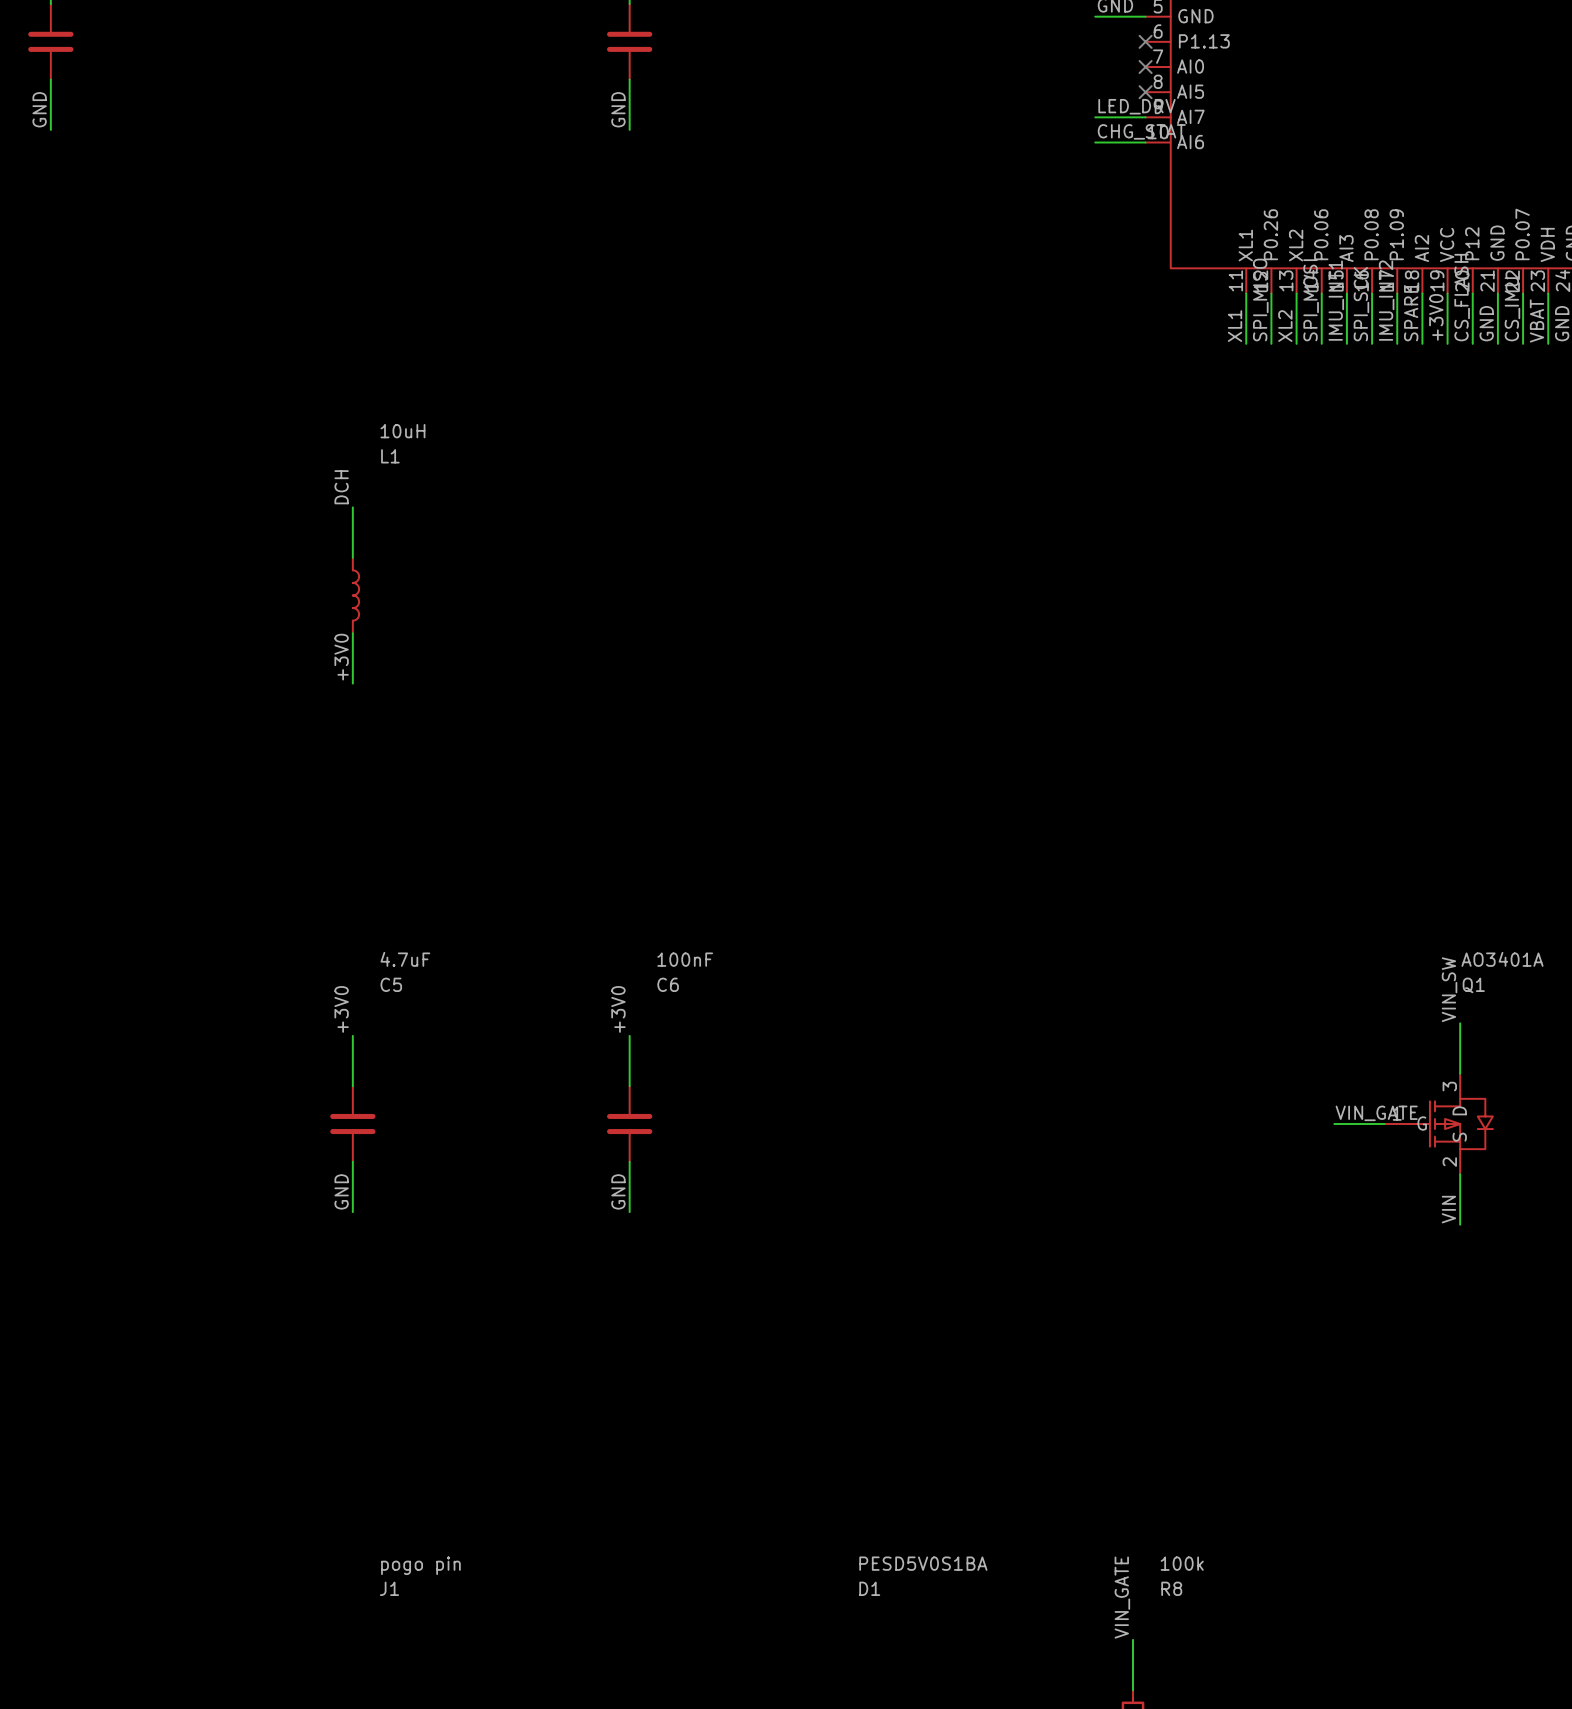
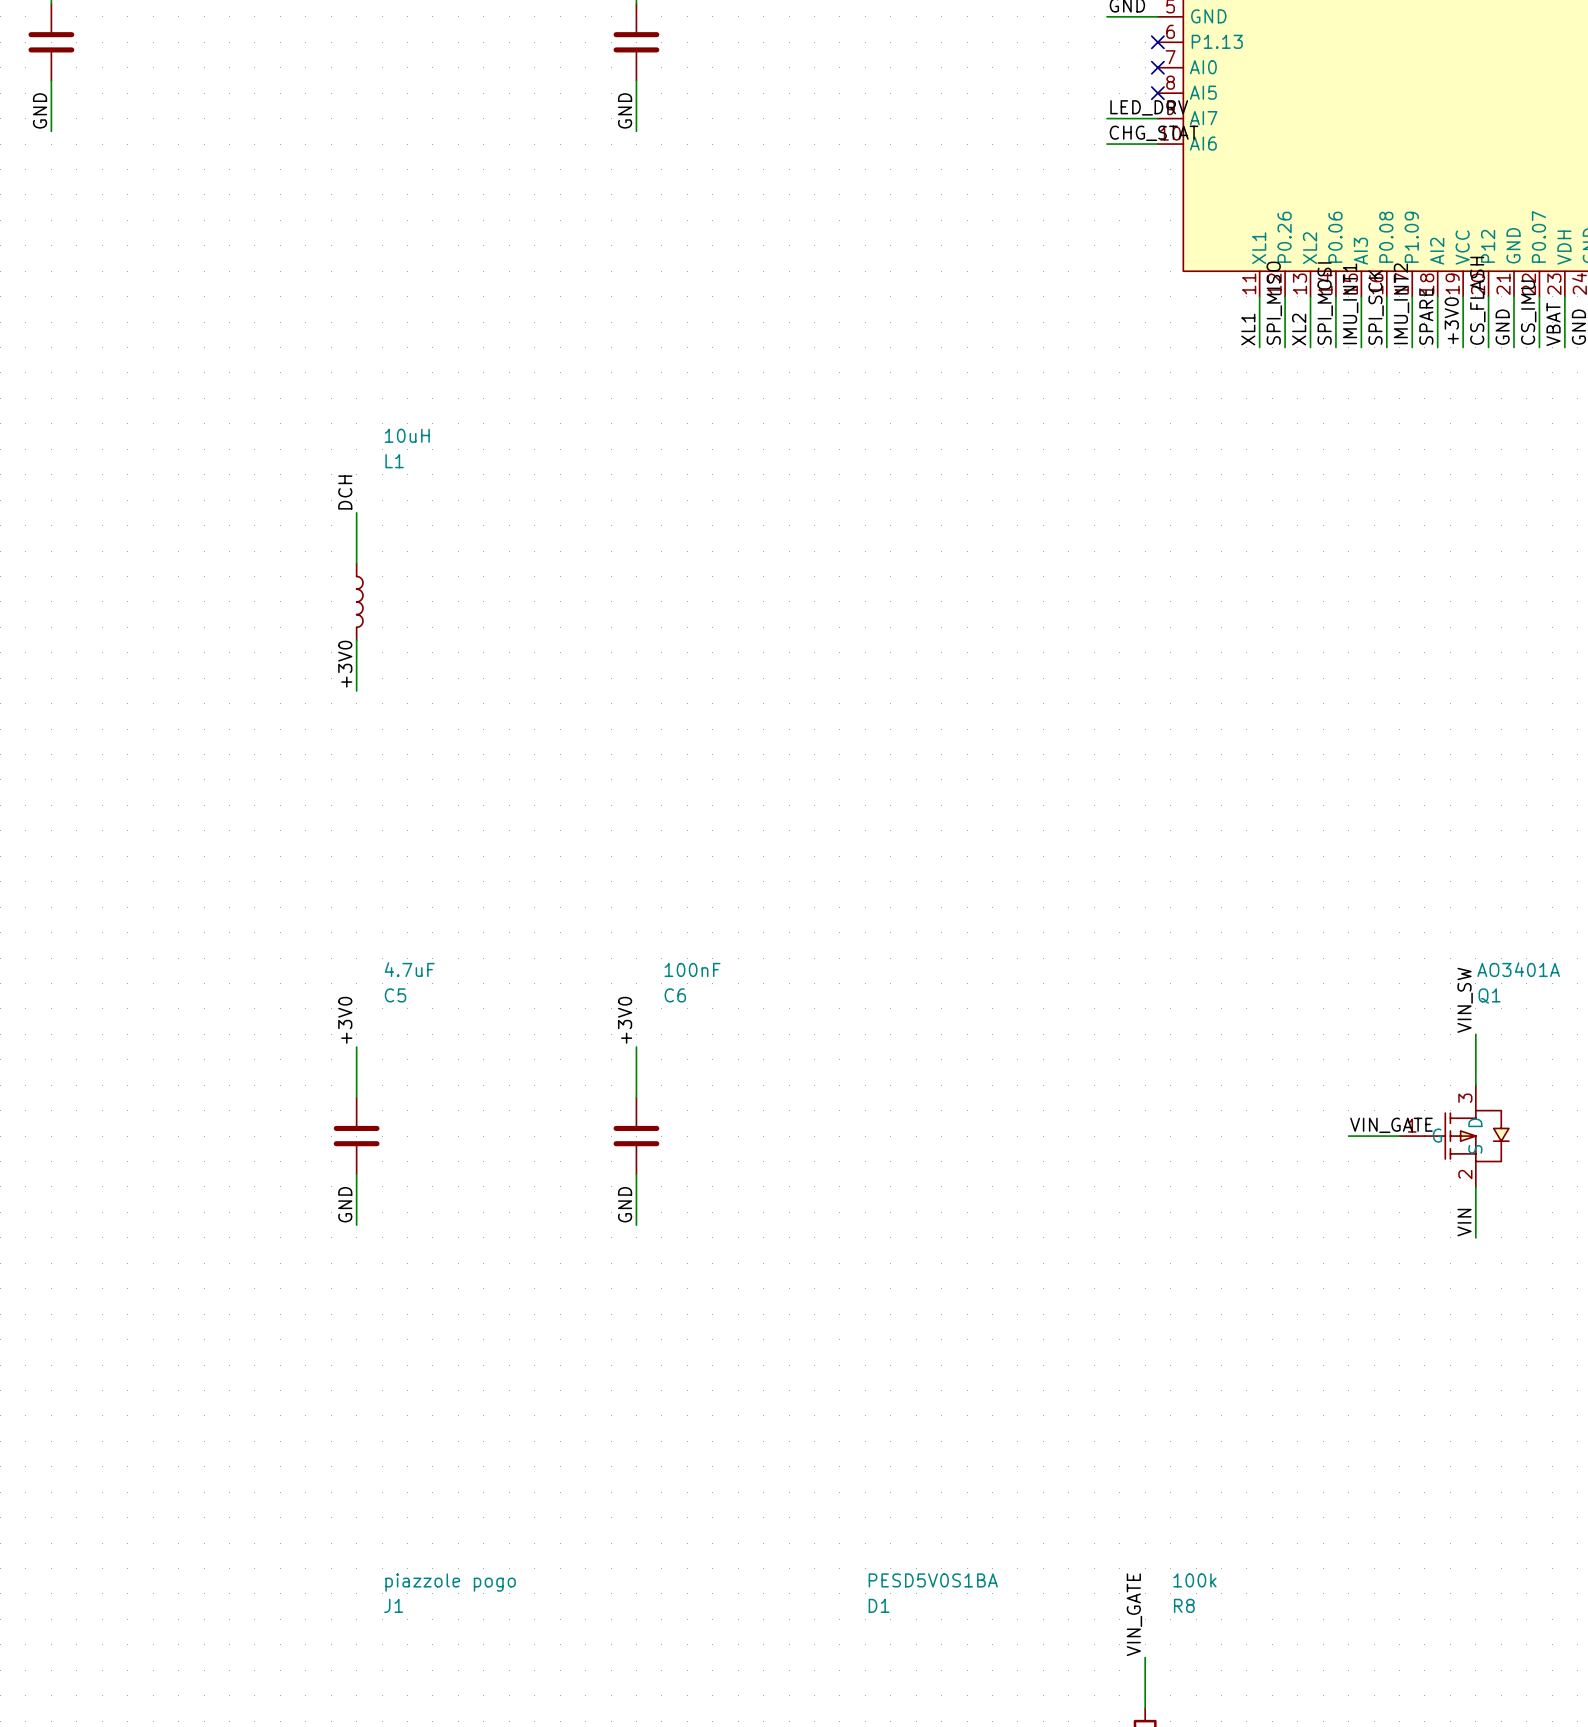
J1 value: pogo pin (420, 1565) -> piazzole pogo (450, 1582)

